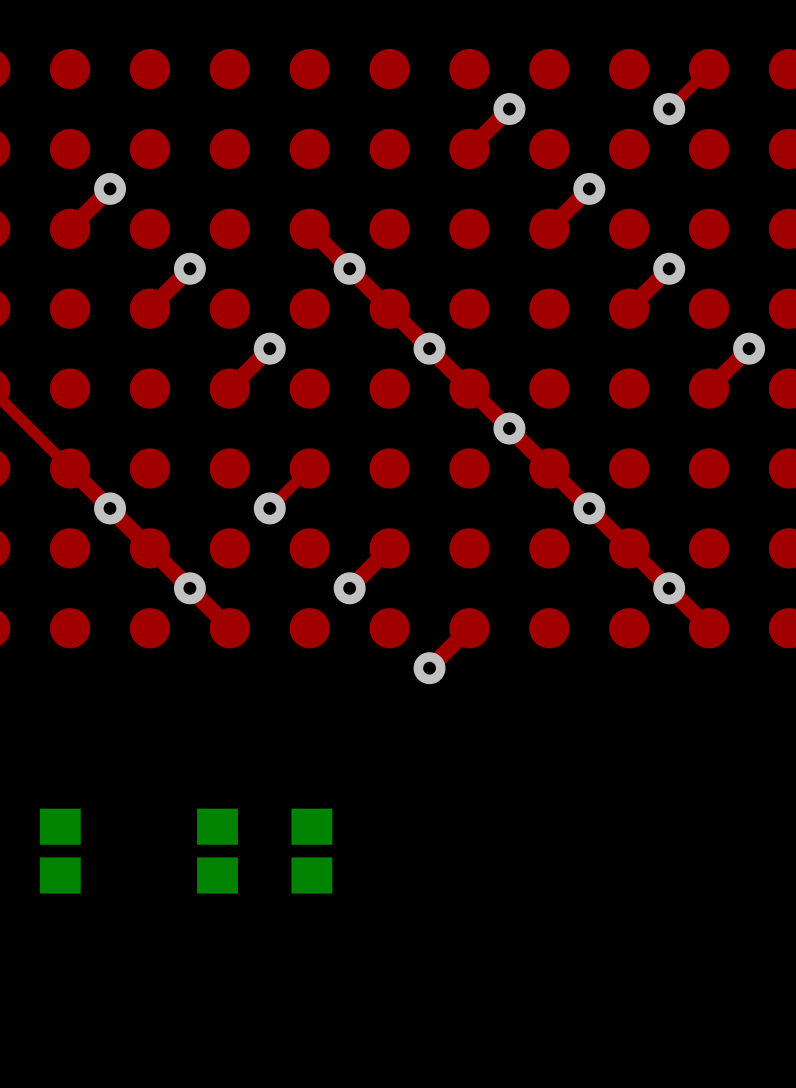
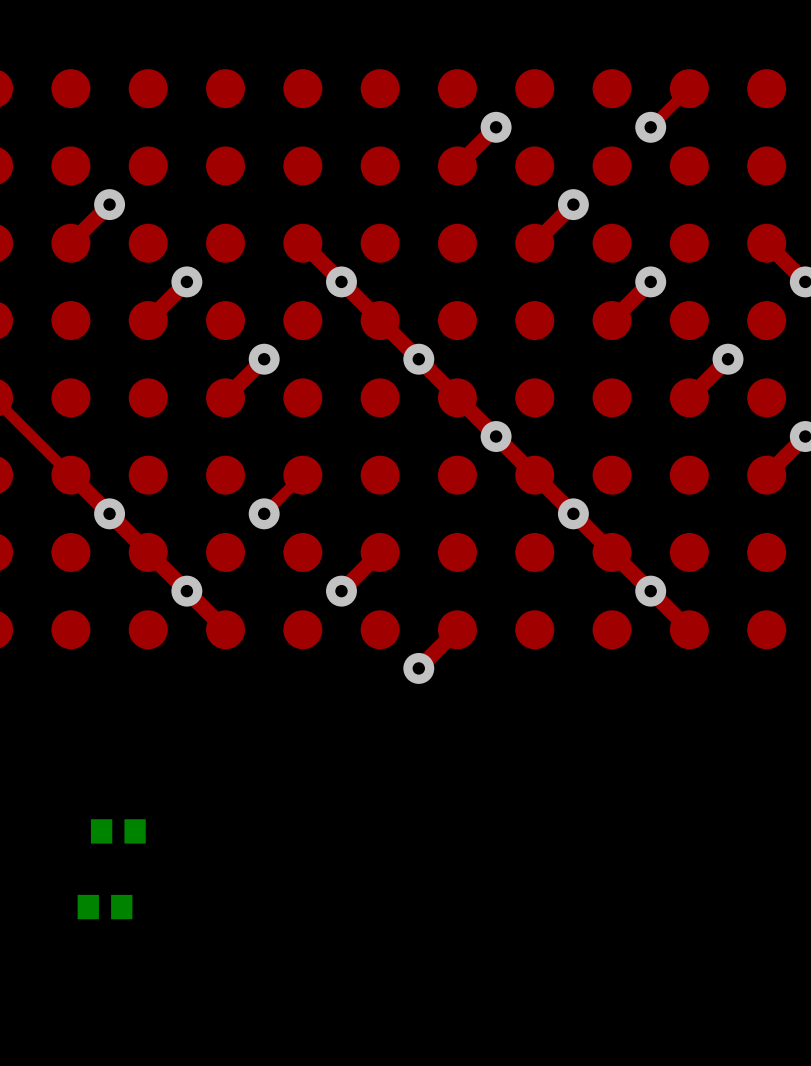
part: none -> (118, 831)
part: (60, 851) -> none
part: (217, 851) -> none
part: (311, 851) -> none
part: none -> (105, 907)

